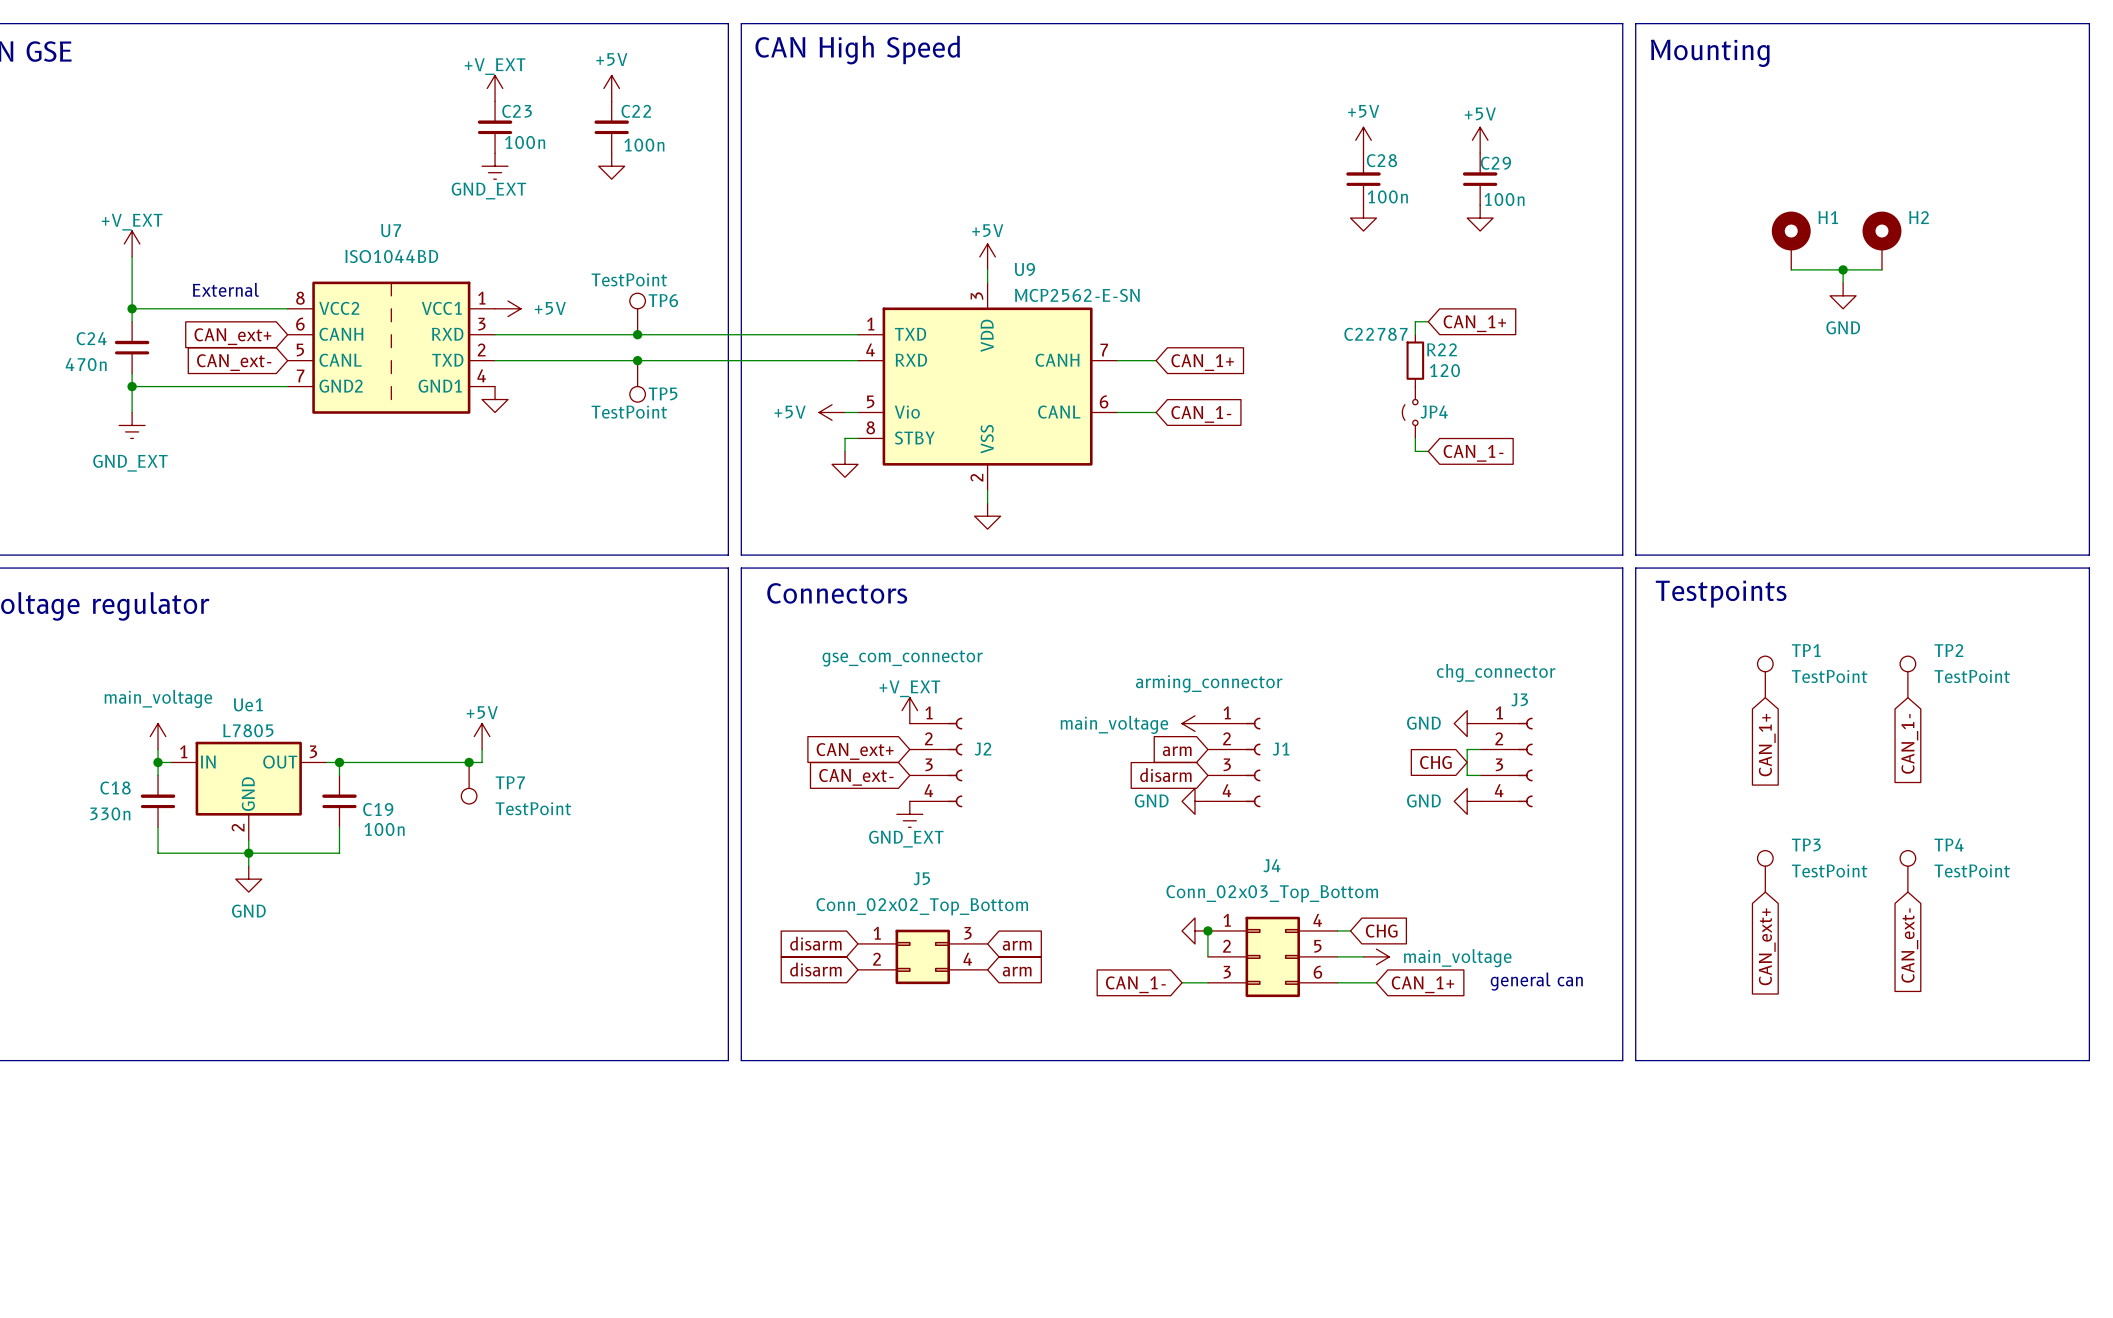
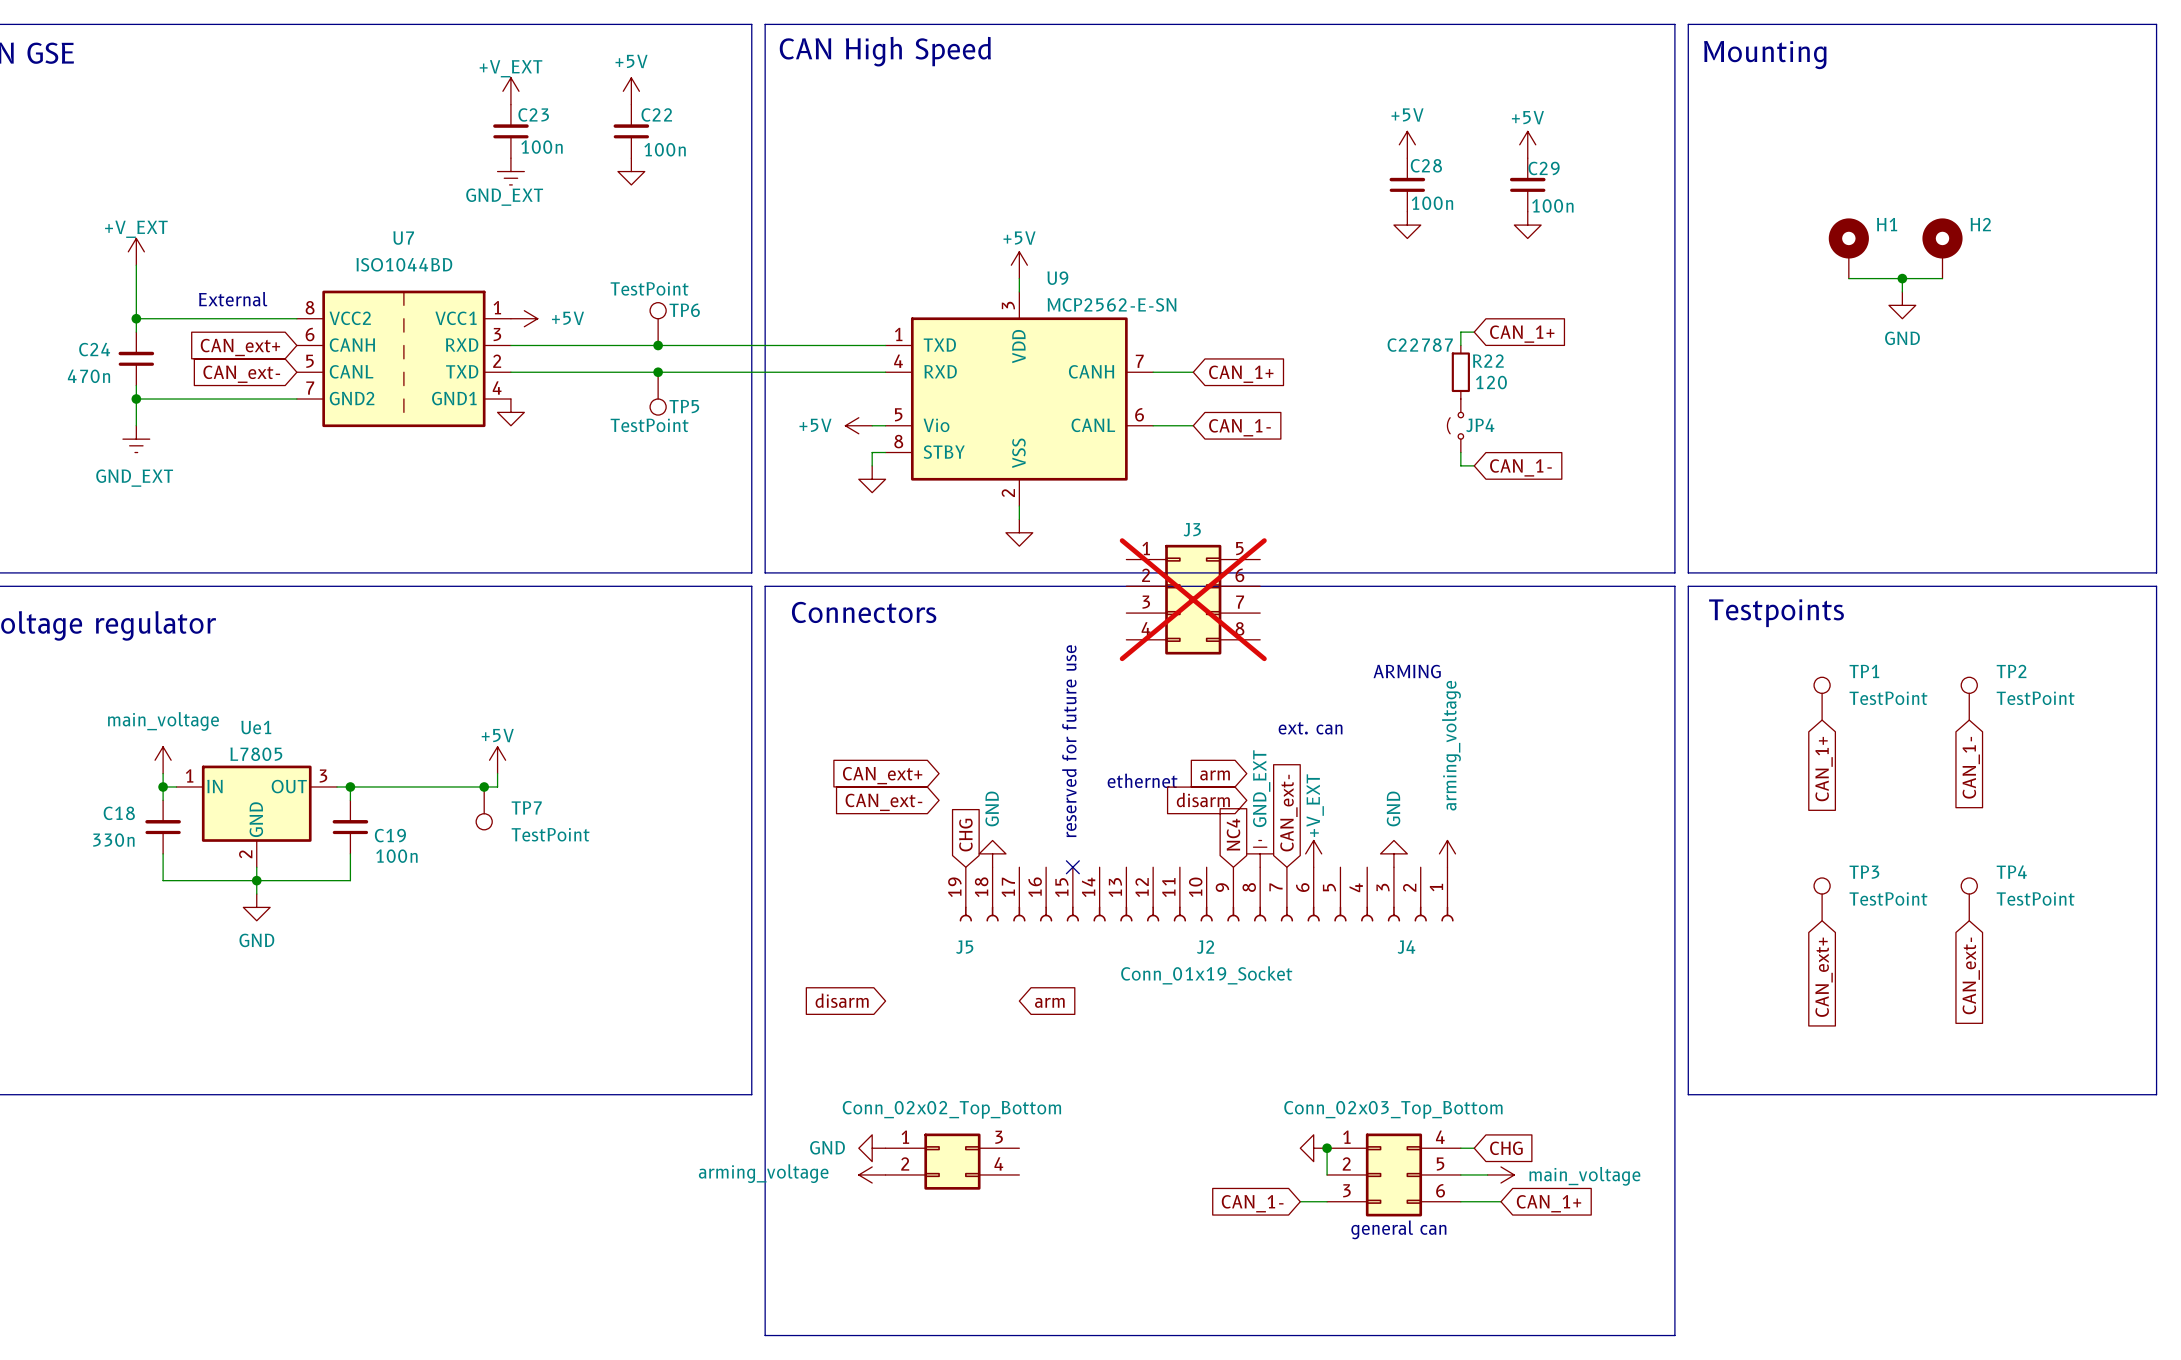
J3 do-not-place cross: none -> (1193, 599)
text: none -> ARMING (1407, 671)
J2 value: gse_com_connector (902, 658) -> Conn_01x19_Socket (1206, 975)
J3 value: chg_connector (1496, 673) -> none
text: none -> ext. can (1310, 728)
power symbol: +V_EXT (909, 710) -> none
J2 symbol: [909, 717, 963, 808] -> [959, 867, 1454, 922]
J3 symbol: [1480, 717, 1533, 808] -> [1126, 544, 1261, 655]
text: none -> reserved for future use (1069, 741)
power symbol: main_voltage (1194, 723) -> none
power symbol: GND (1467, 723) -> none
J2 name position: J2 (982, 749) -> J2 (1205, 947)
wire: (1480, 749) (1467, 749) (1467, 775) (1480, 775) -> none
text: none -> ethernet (1142, 780)
J1: arming_connector (1234, 762) -> none
global label: CHG (1435, 762) -> none
global label: none -> CAN_ext- (1288, 813)
power symbol: GND (1194, 801) -> none
power symbol: GND (1467, 801) -> none
global label: none -> NC4 (1233, 834)
global label: none -> CHG (965, 835)
power symbol: GND_EXT (909, 814) -> none
power symbol: none -> GND (992, 853)
power symbol: none -> GND_EXT (1260, 853)
power symbol: none -> +V_EXT (1313, 853)
power symbol: none -> GND (1393, 853)
power symbol: none -> arming_voltage (1447, 853)
no-connect mark: none -> (1072, 867)
J4 name position: J4 (1271, 865) -> J4 (1406, 947)
J5 name position: J5 (921, 878) -> J5 (964, 947)
power symbol position: (1194, 930) -> (1313, 1148)
wire: (1207, 930) (1207, 956) -> (1327, 1148) (1327, 1174)
junction: (1207, 930) -> none
wire: (1337, 930) (1350, 930) -> (1460, 1148) (1474, 1148)
global label: CHG (1381, 931) -> none
global label: disarm (815, 943) -> none
global label: arm (1017, 945) -> none
J5 position: (922, 956) -> (952, 1161)
J4 position: (1272, 956) -> (1393, 1174)
wire: (1337, 956) (1363, 956) -> (1460, 1174) (1487, 1174)
power symbol position: main_voltage (1376, 956) -> main_voltage (1500, 1174)
text: general can (1536, 981) -> none
wire: (1182, 982) (1207, 982) -> (1300, 1201) (1327, 1201)
wire: (1337, 982) (1376, 982) -> (1460, 1201) (1500, 1201)
global label position: CAN_1- (1135, 984) -> CAN_1- (1252, 1203)
global label position: CAN_1+ (1422, 984) -> CAN_1+ (1549, 1203)
line: (741, 1060) (1622, 1060) -> (765, 1094) (765, 1335) (1674, 1335) (1674, 1094)
power symbol: none -> GND (872, 1148)
junction: none -> (1327, 1148)
global label: none -> CHG (1506, 1148)
power symbol: none -> arming_voltage (872, 1174)
text: none -> general can (1398, 1229)

